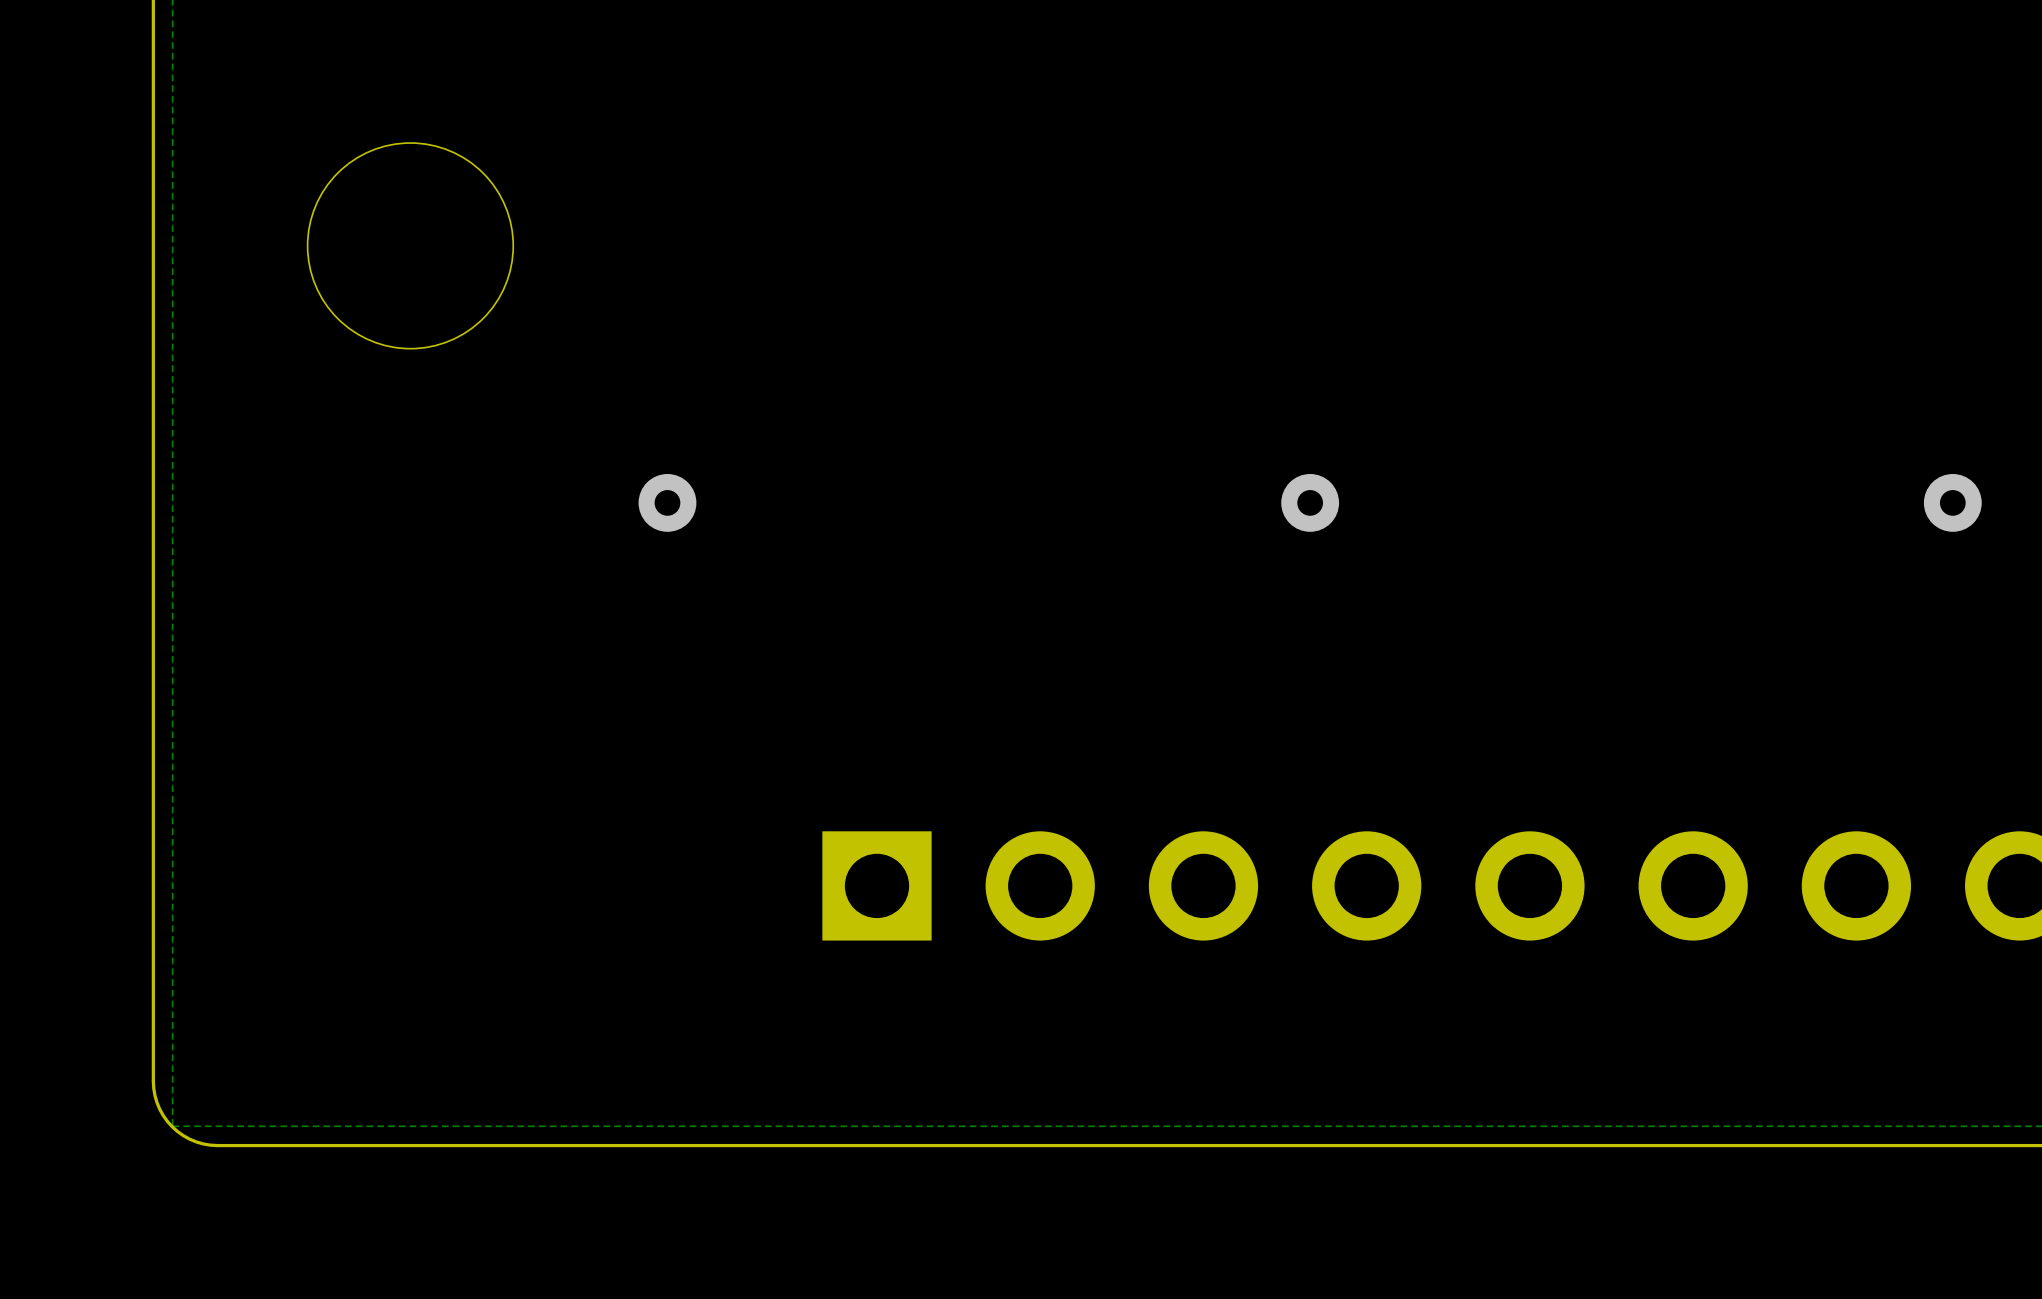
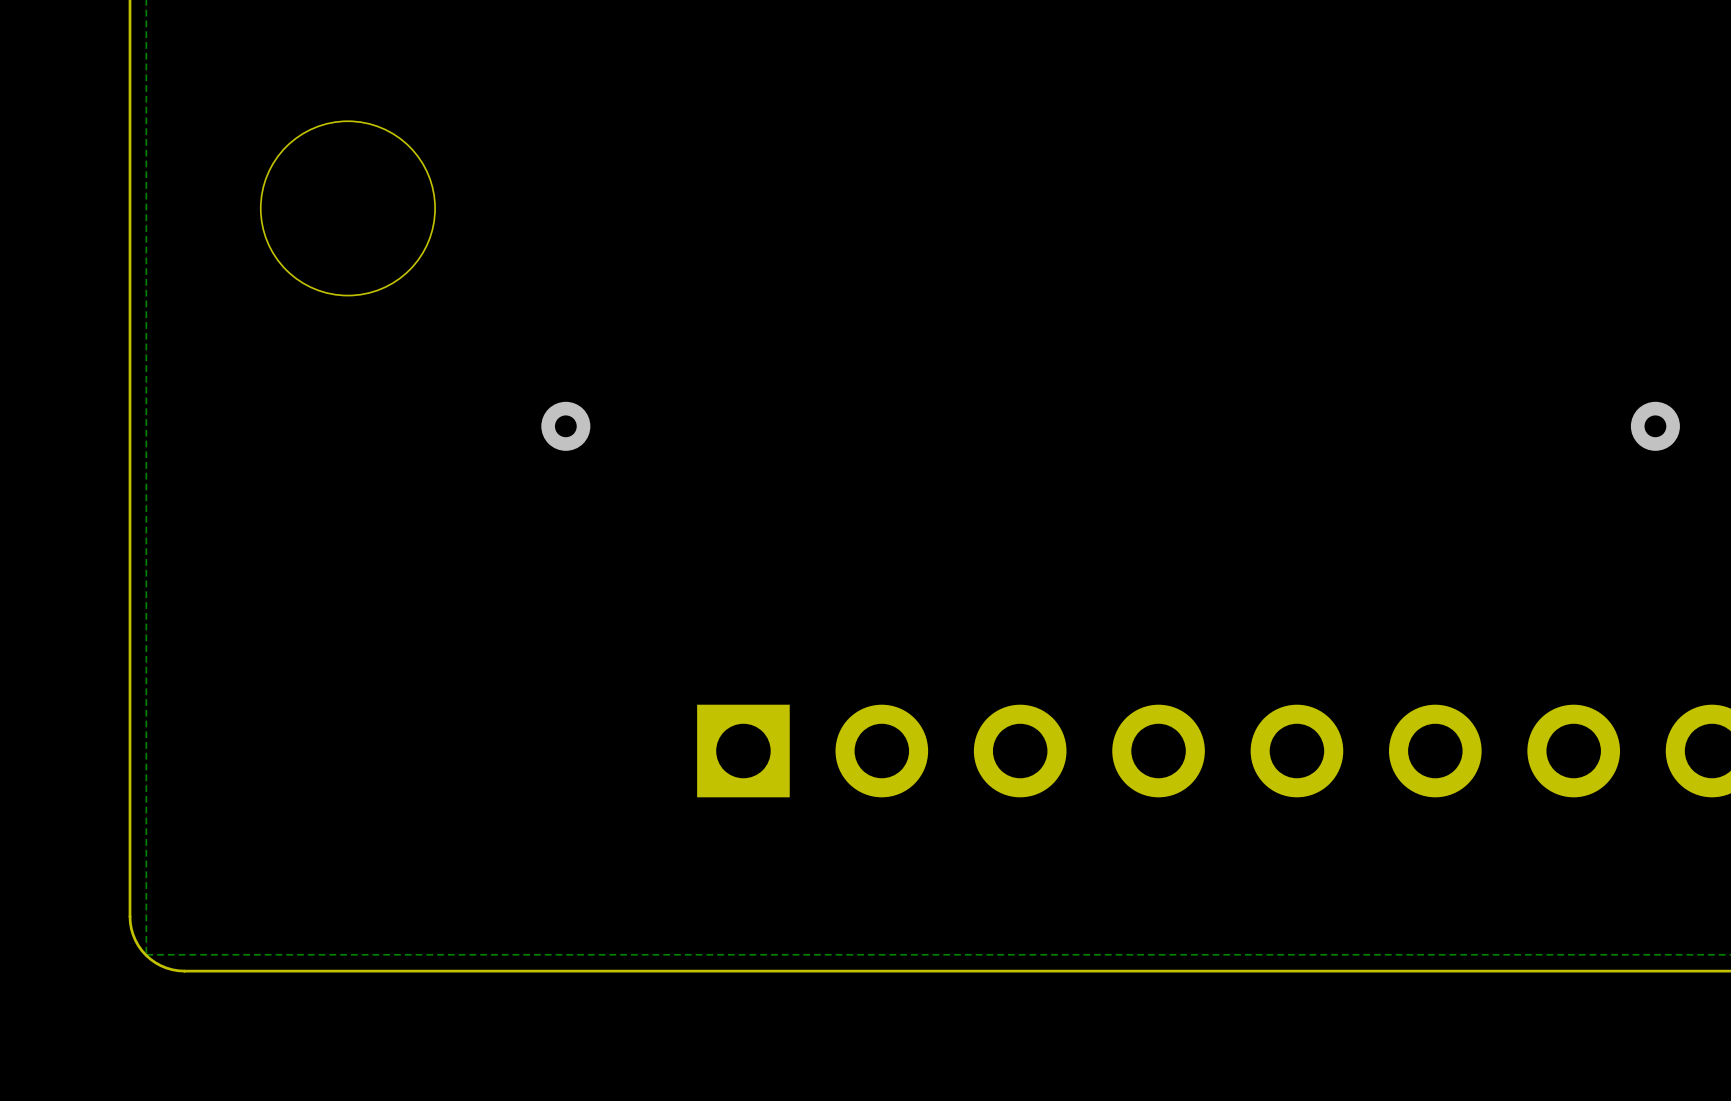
via: (1310, 502) -> none

